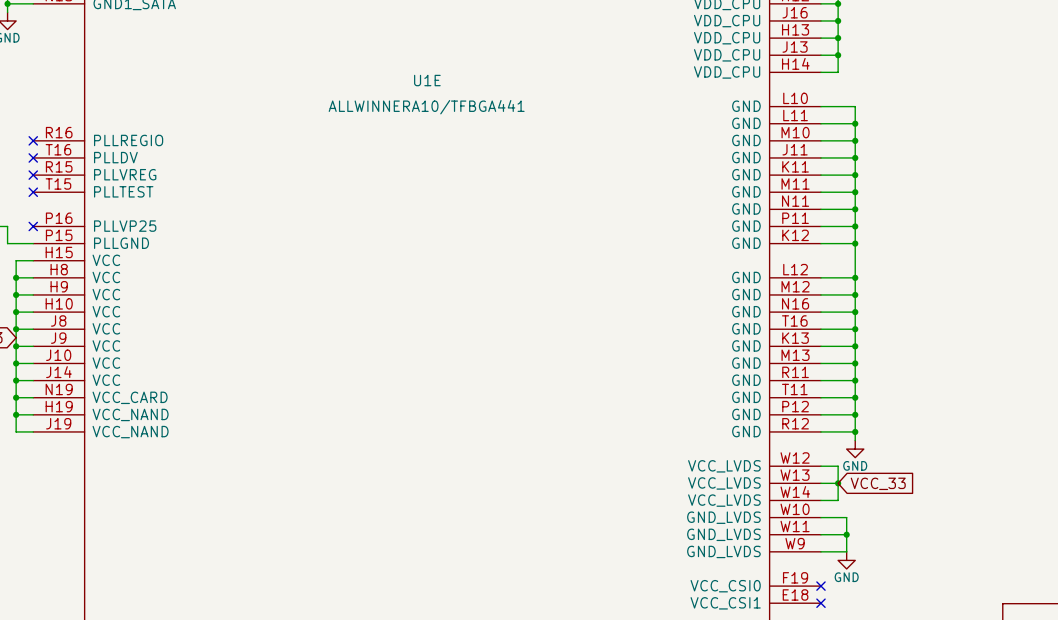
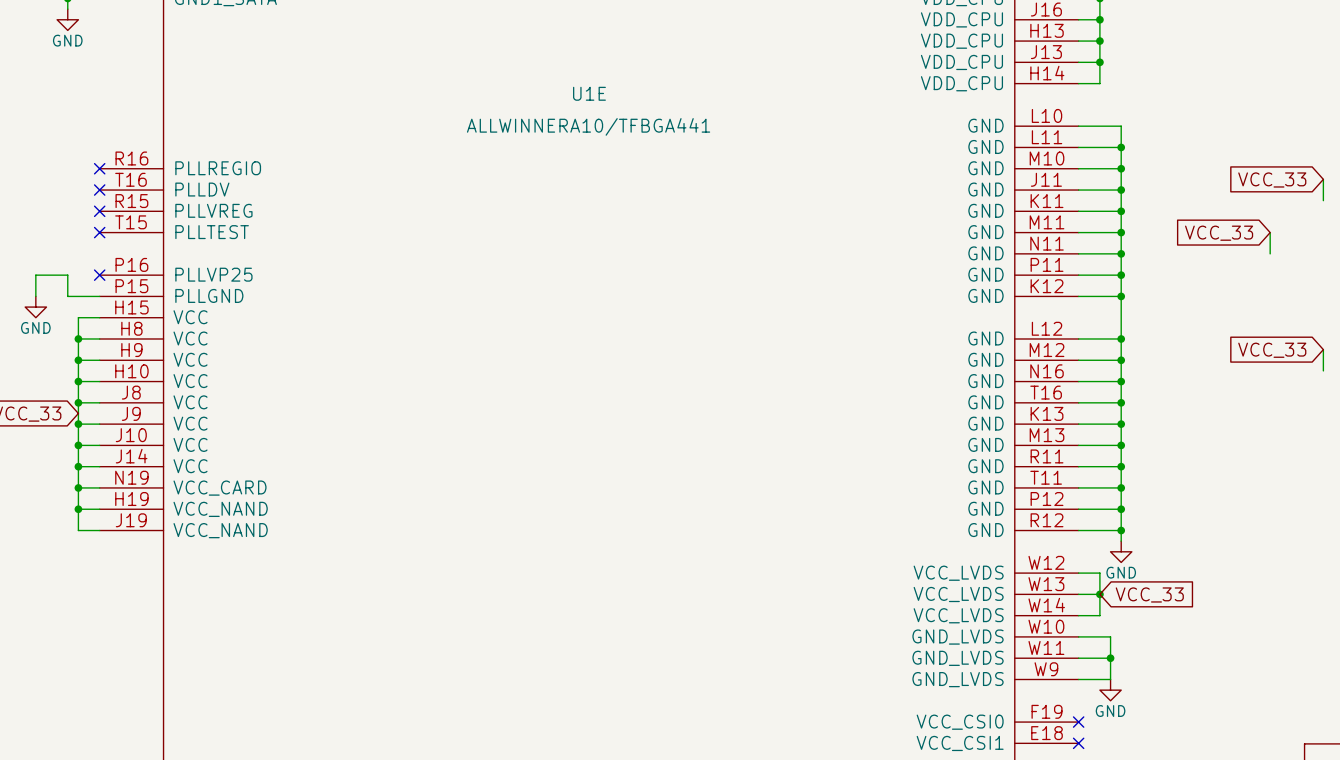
global label: none -> VCC_33 (1272, 179)
wire: none -> (1323, 179) (1323, 200)
global label: none -> VCC_33 (1219, 233)
wire: none -> (1270, 232) (1270, 253)
global label: none -> VCC_33 (1272, 350)
wire: none -> (1323, 349) (1323, 370)

